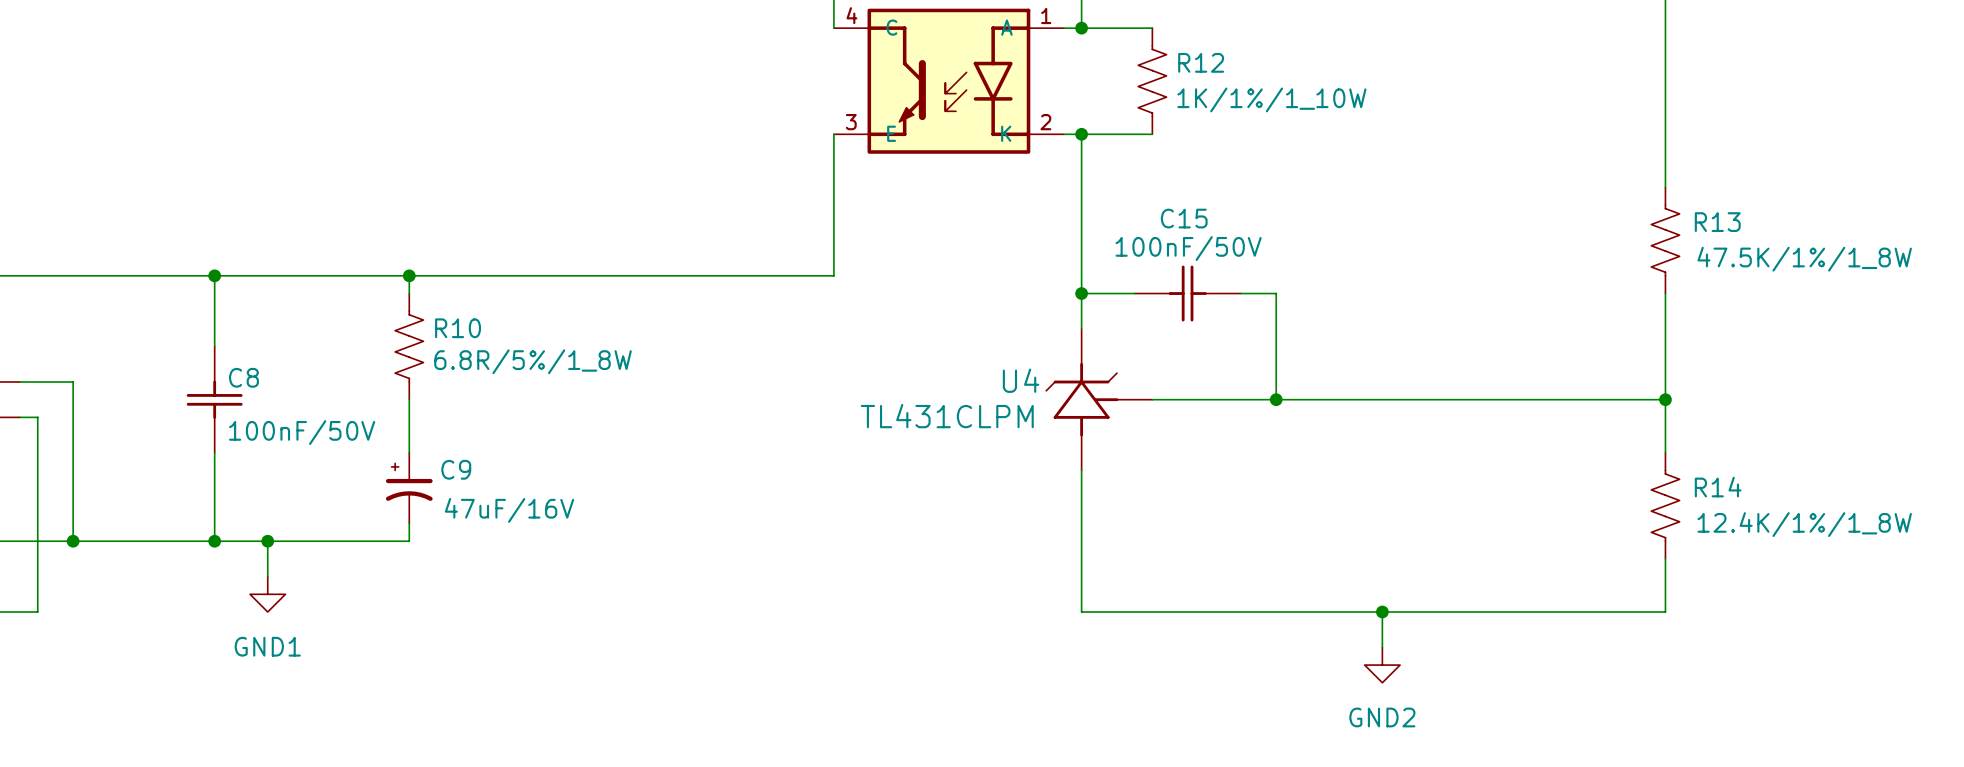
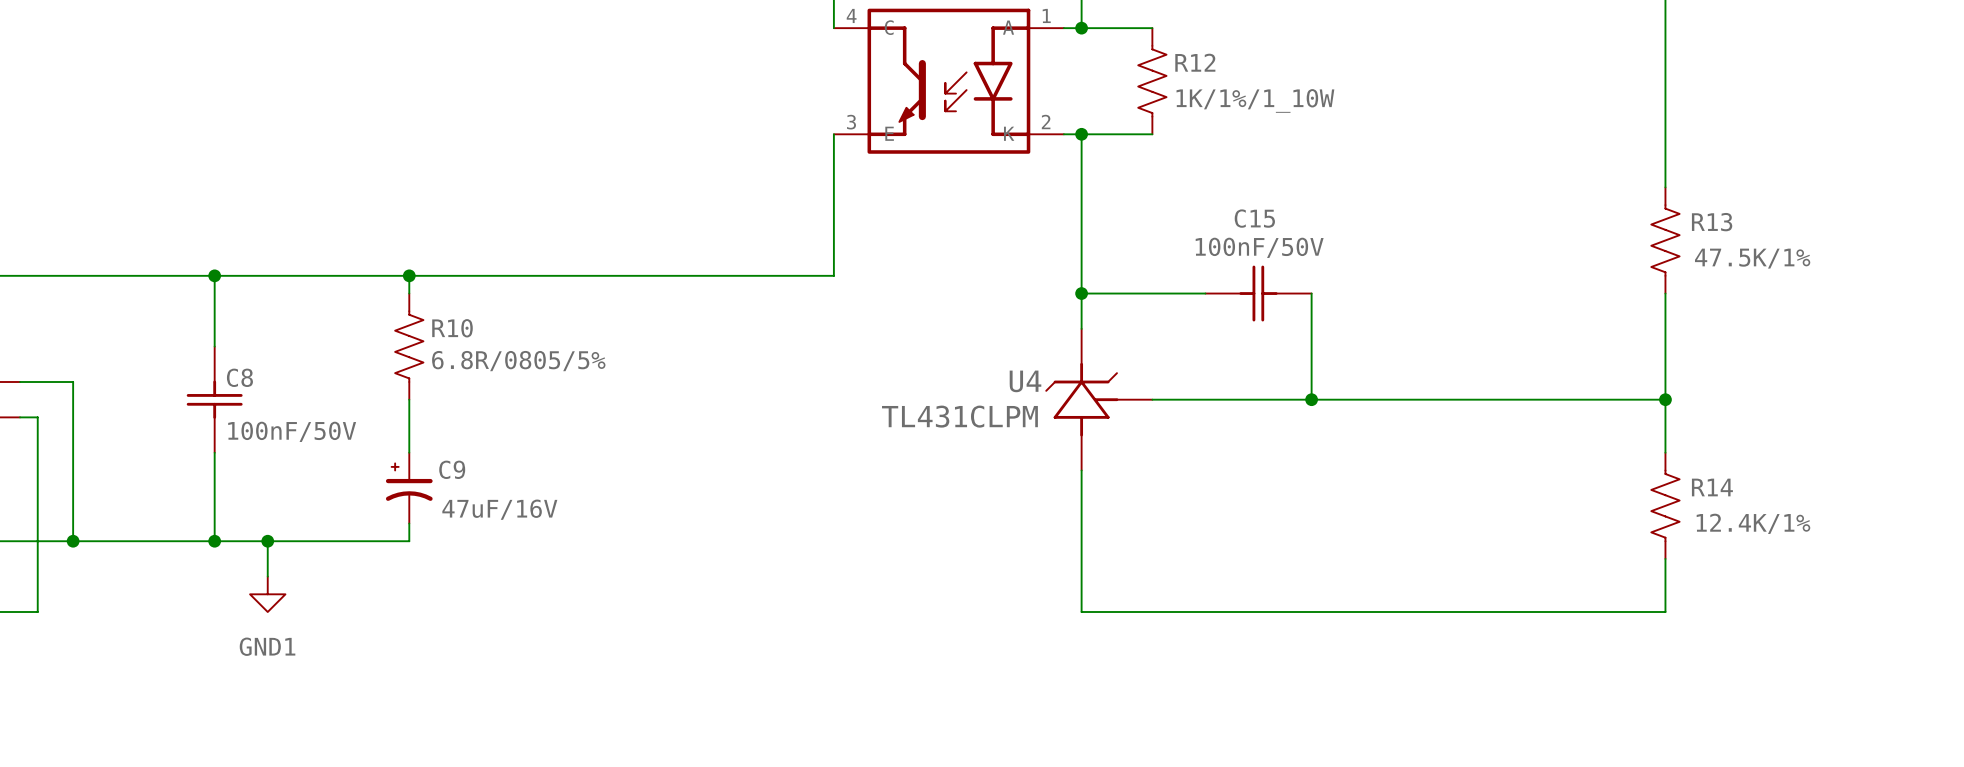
R13 value: 47.5K/1%/1_8W (1804, 259) -> 47.5K/1% (1752, 258)
C15 position: (1187, 293) -> (1258, 293)
wire: (1240, 293) (1276, 293) (1276, 399) -> none
wire: none -> (1311, 293) (1311, 399)
R10 value: 6.8R/5%/1_8W (533, 361) -> 6.8R/0805/5% (518, 361)
junction position: (1276, 399) -> (1311, 399)
R14 value: 12.4K/1%/1_8W (1804, 524) -> 12.4K/1% (1753, 523)
wire: (1382, 612) (1382, 647) -> none
junction: (1382, 612) -> none
power symbol: GND2 (1382, 665) -> none

